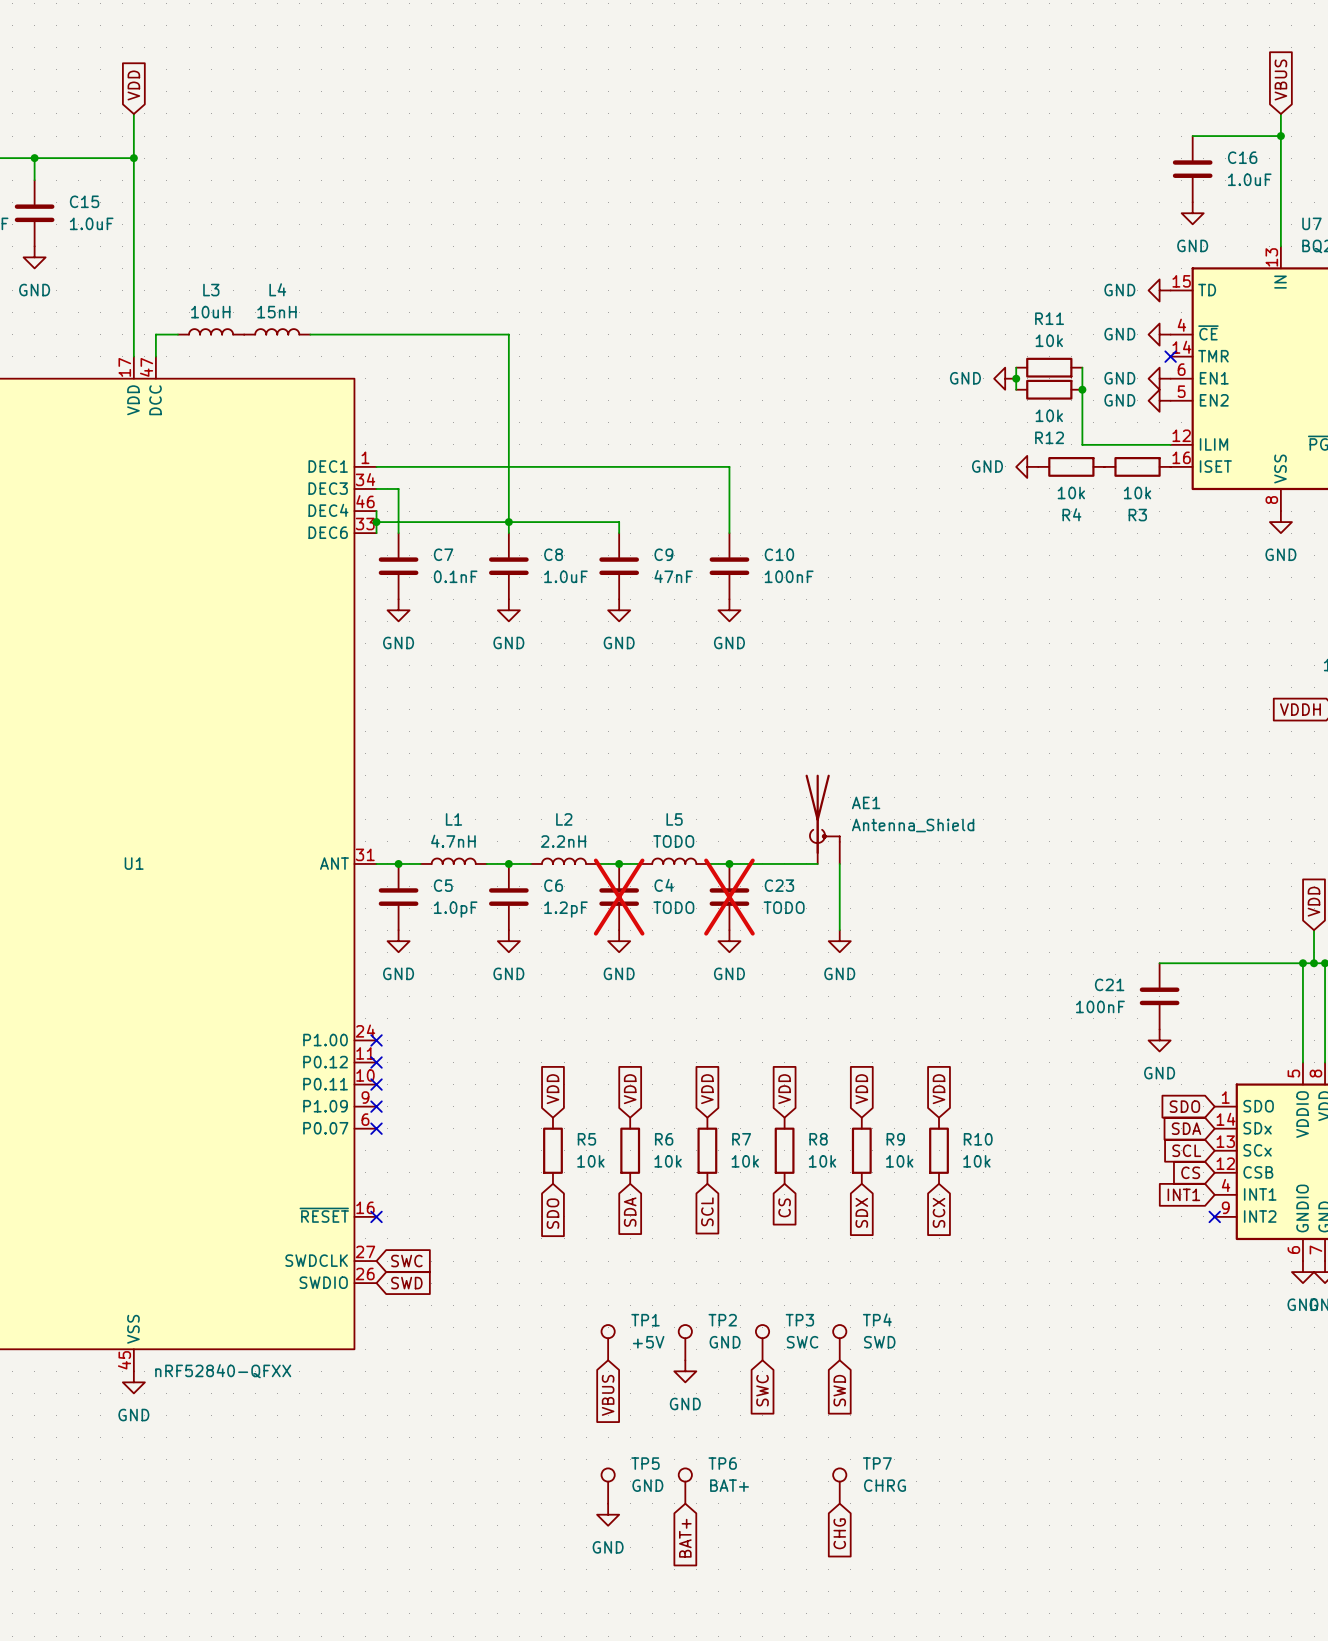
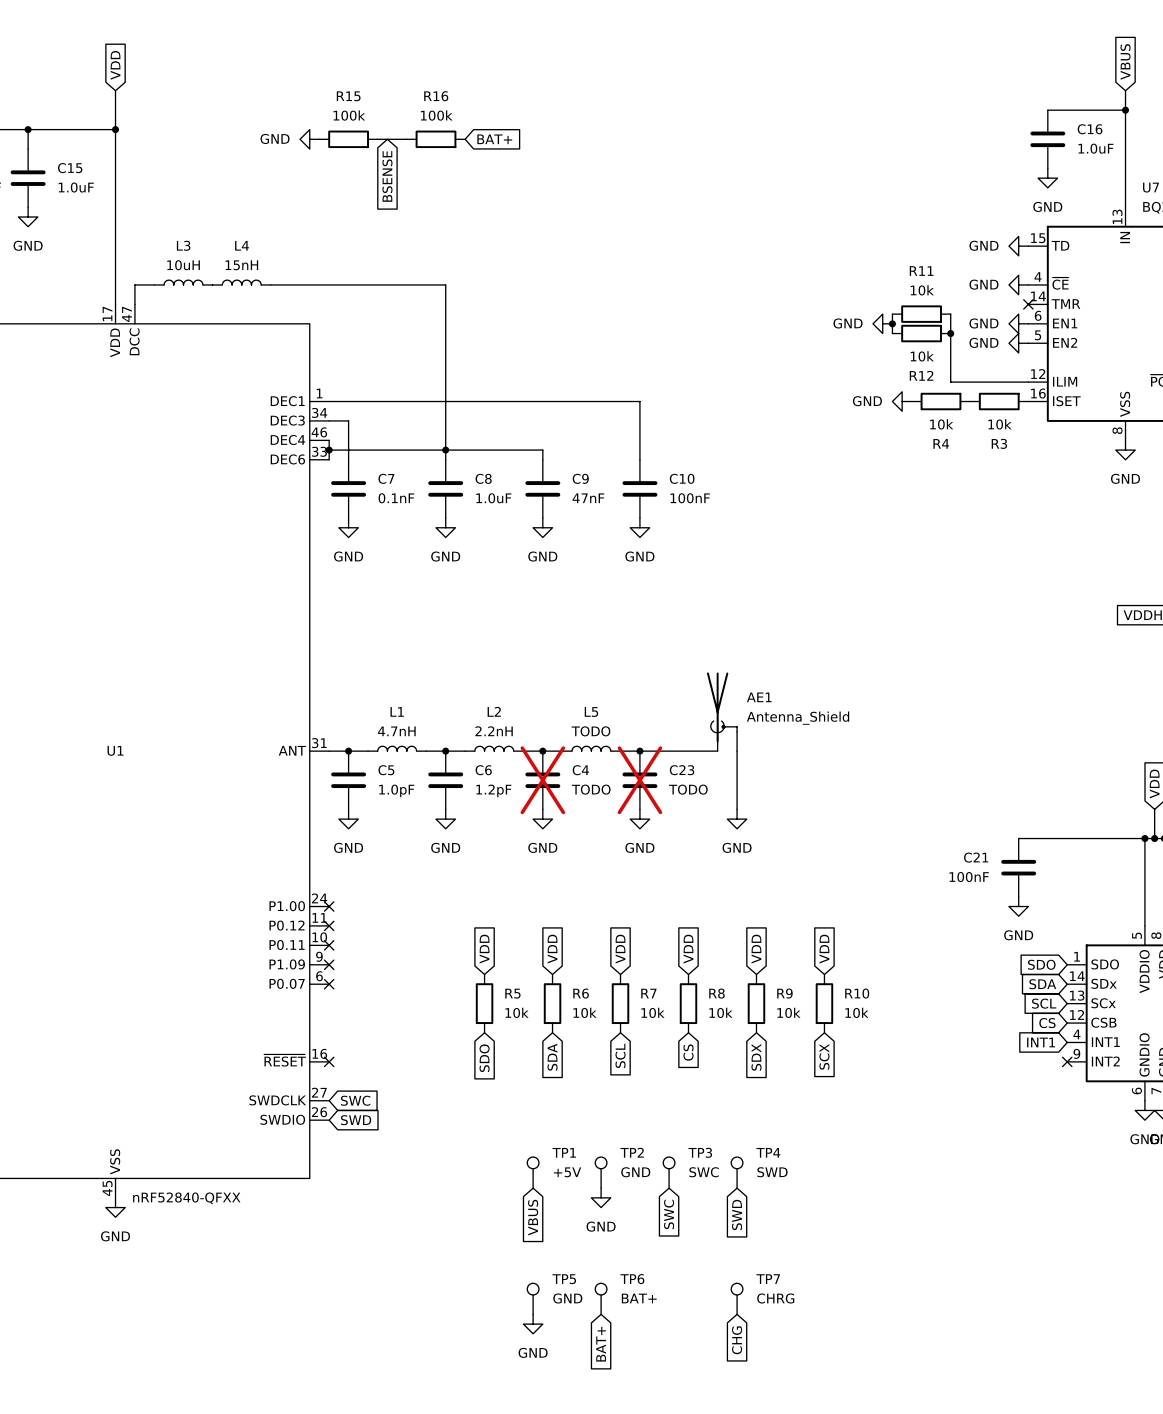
power symbol: none -> GND (309, 139)
R15: none -> 100k (348, 139)
wire: none -> (377, 139) (406, 139)
R16: none -> 100k (436, 139)
global label: none -> BAT+ (494, 139)
global label: none -> BSENSE (387, 176)

